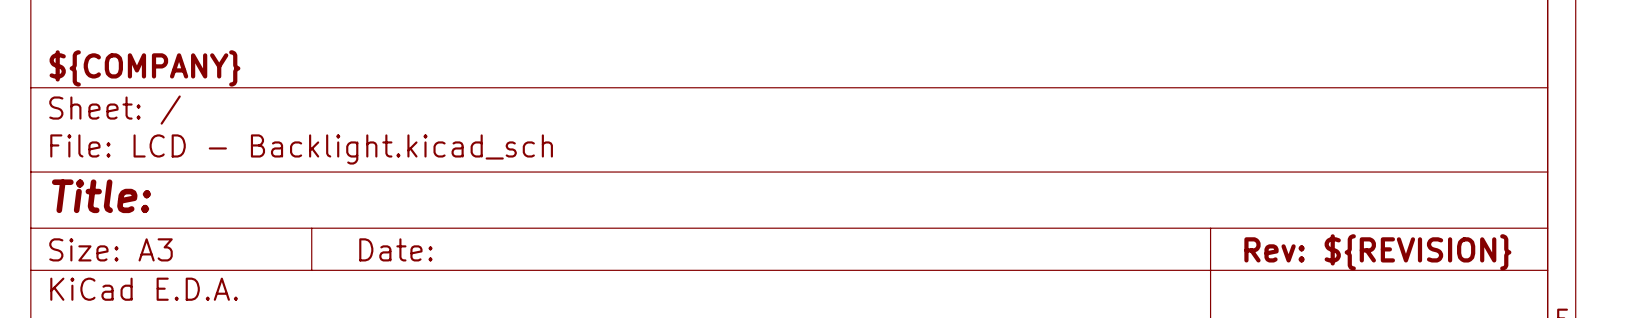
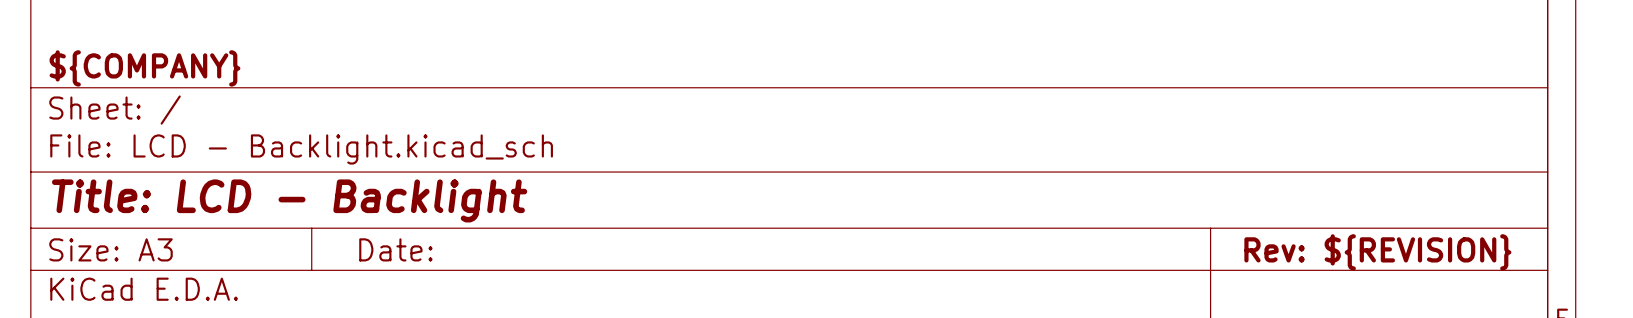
title block: Title: (101, 196) -> Title: LCD - Backlight (289, 200)

